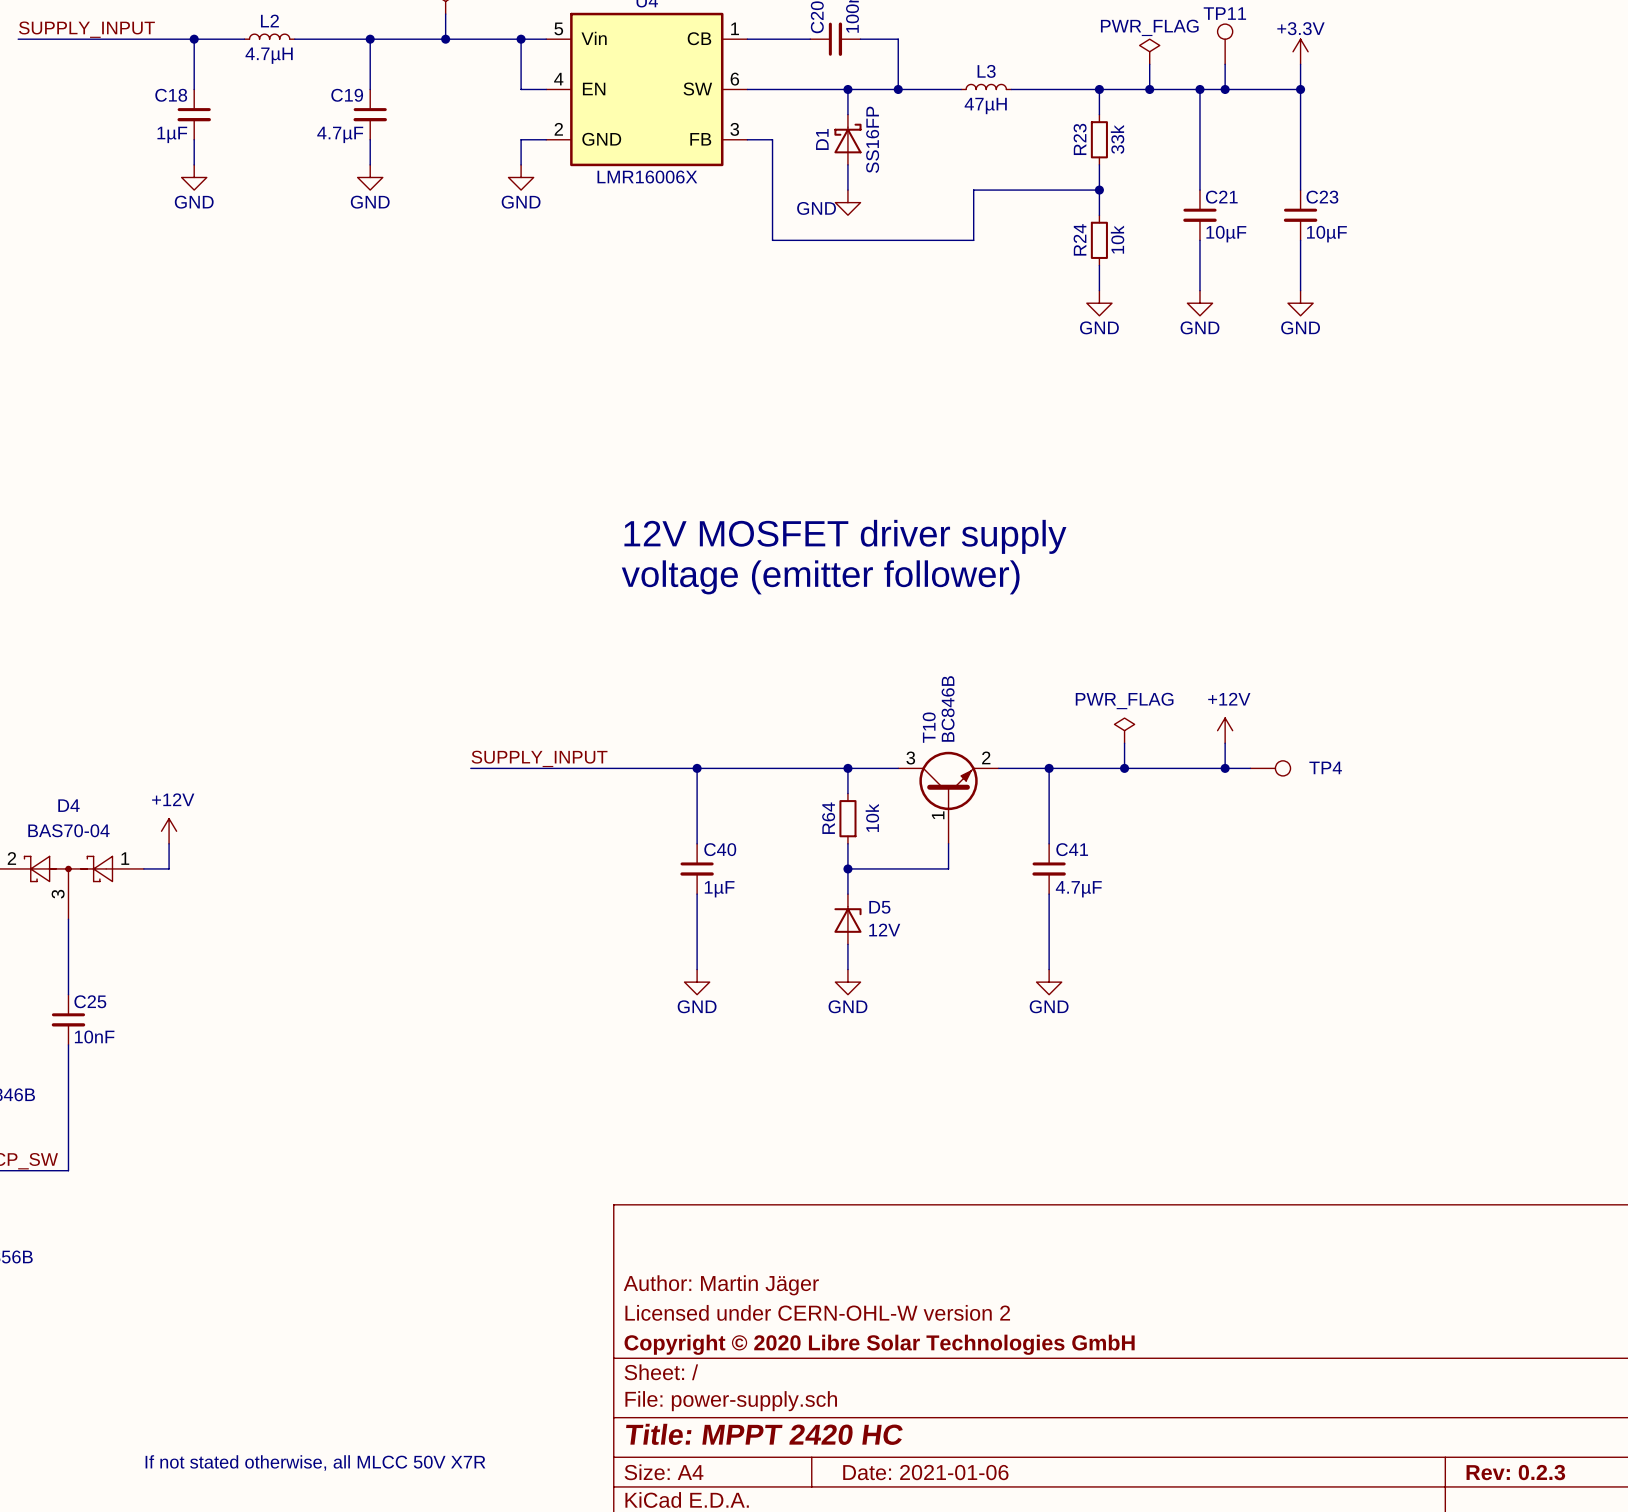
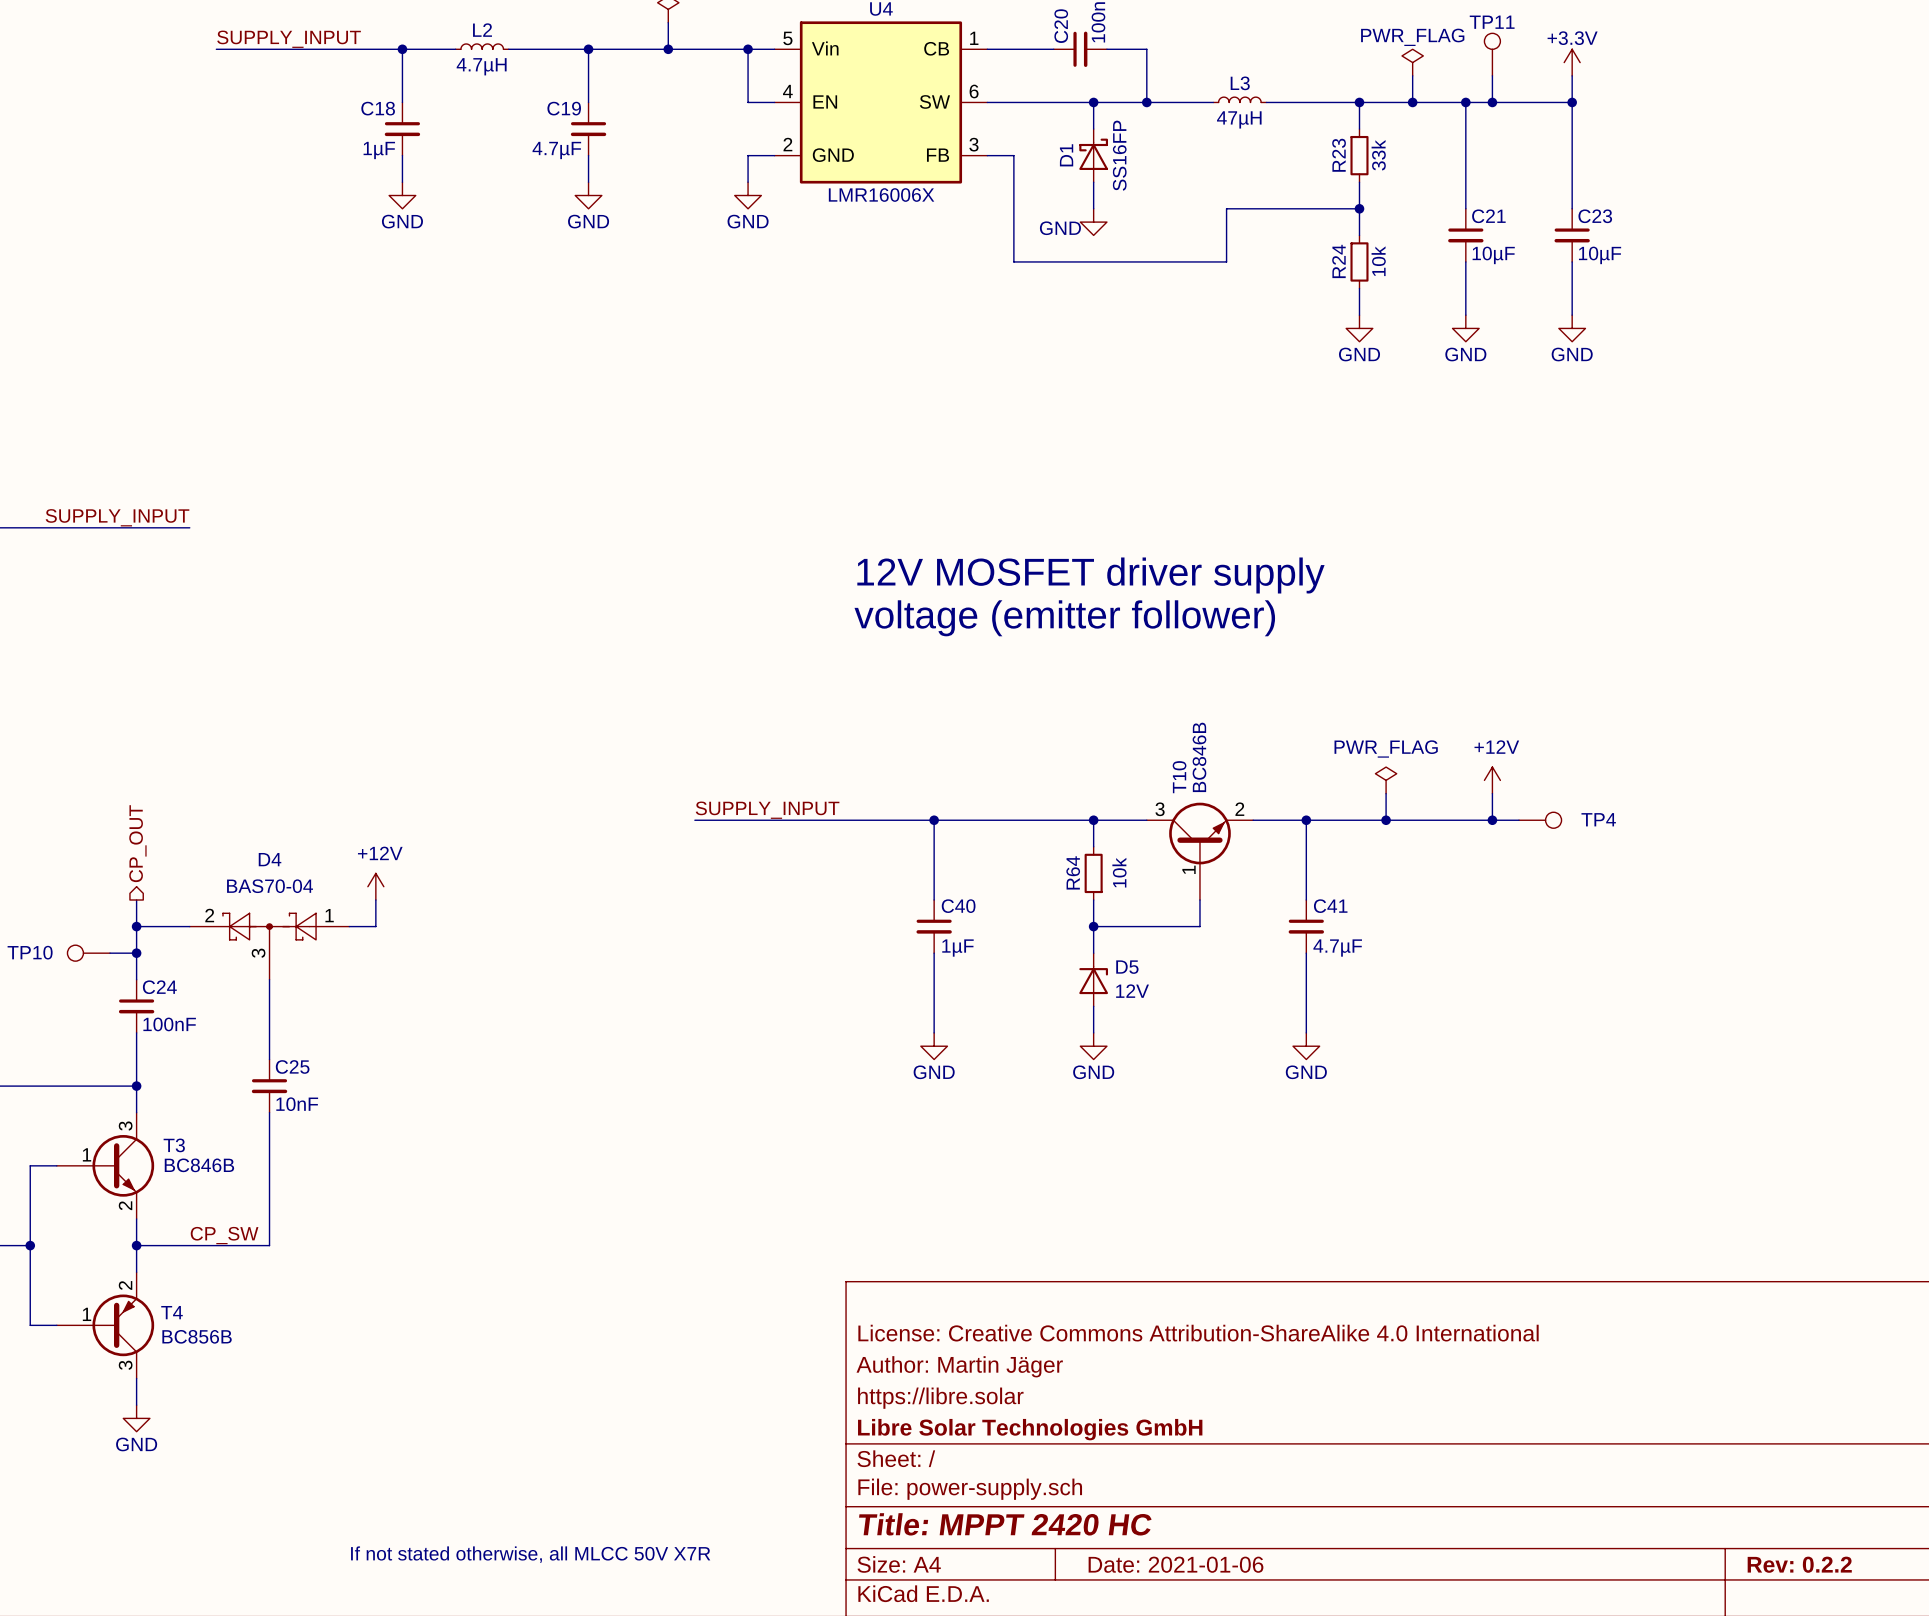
title block: none -> License: Creative Commons Attribution-ShareAlike 4.0 International (1198, 1333)
title block: Licensed under CERN-OHL-W version 2 (817, 1312) -> https://libre.solar (940, 1398)
title block: Copyright © 2020 Libre Solar Technologies GmbH (879, 1344) -> Libre Solar Technologies GmbH (1030, 1429)
title block: Rev: 0.2.3 (1515, 1472) -> Rev: 0.2.2 (1799, 1564)

